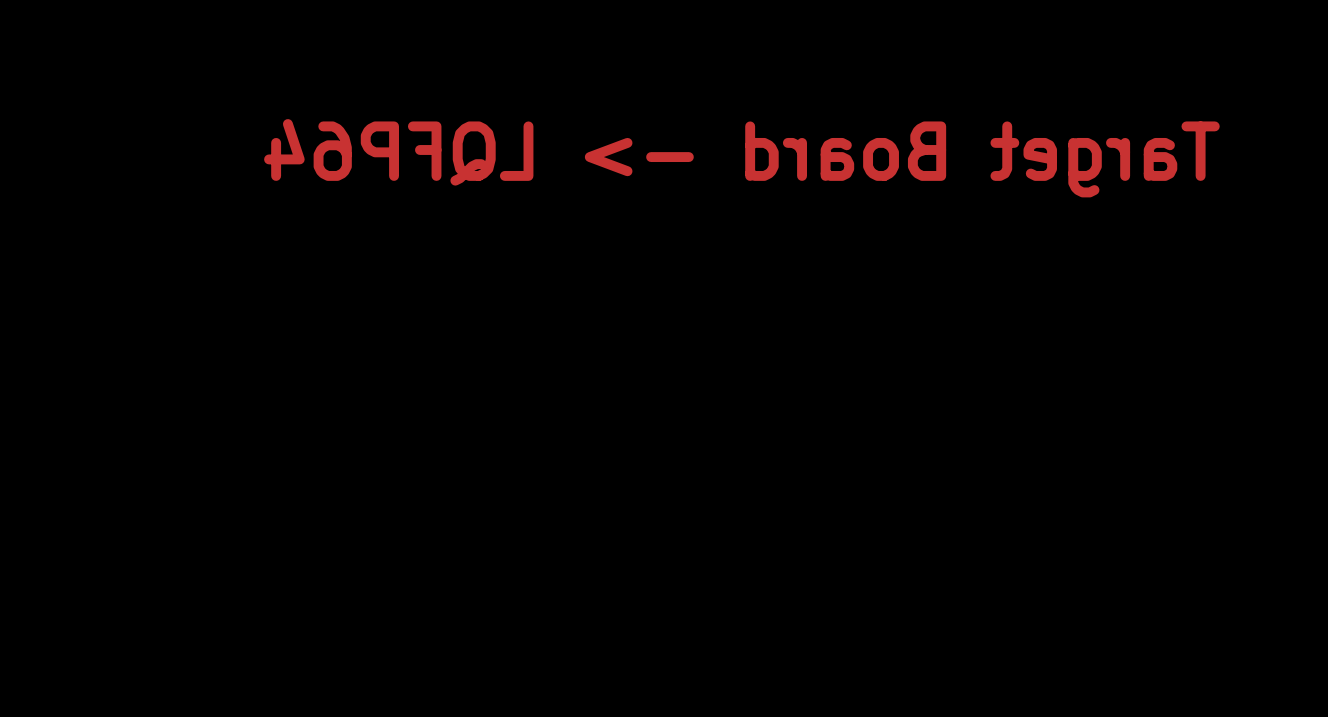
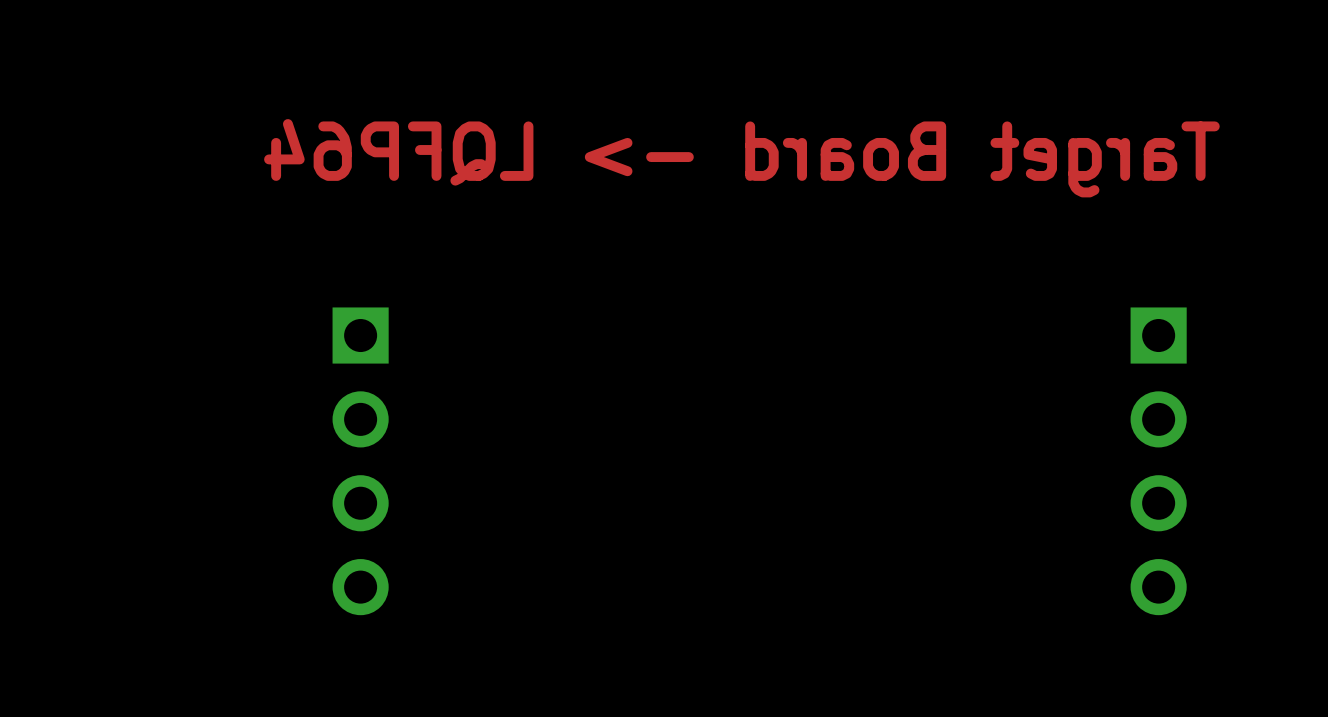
part: none -> (360, 461)
part: none -> (1158, 461)

